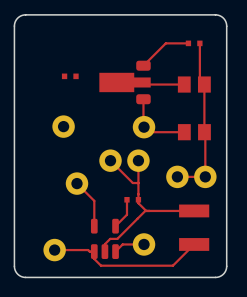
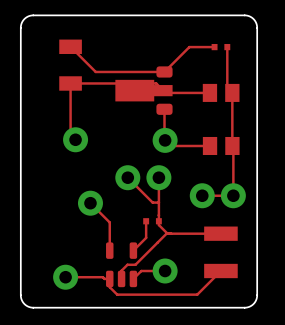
top track: none -> (70, 46) (95, 71) (164, 71)
part: none -> (70, 65)
part: (70, 76) -> none
top track: none -> (165, 92) (156, 83) (70, 83) (70, 134)

